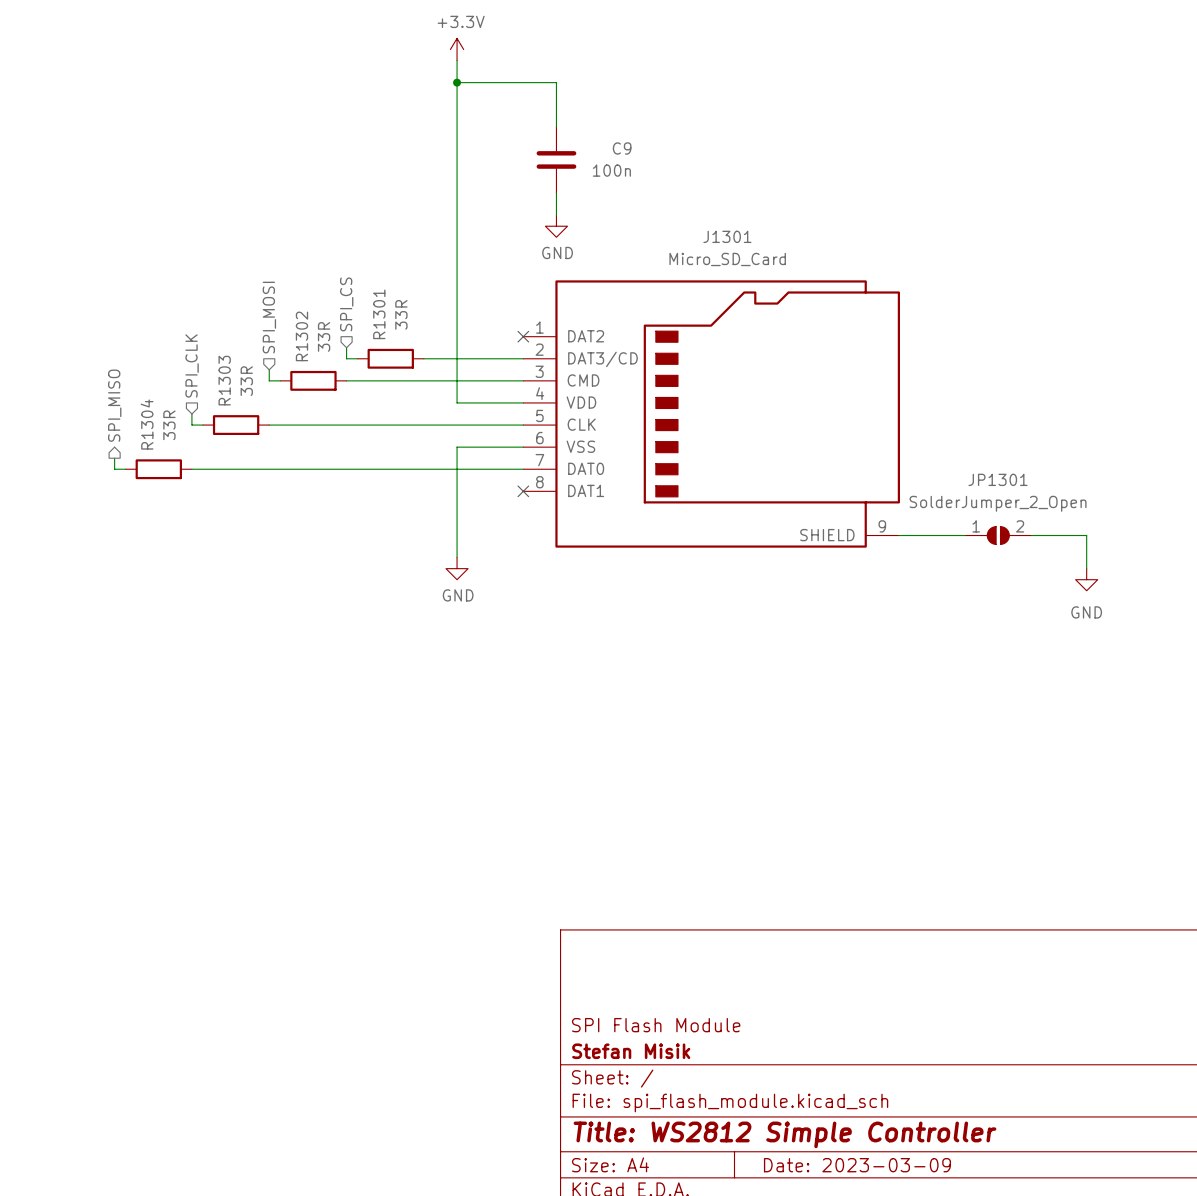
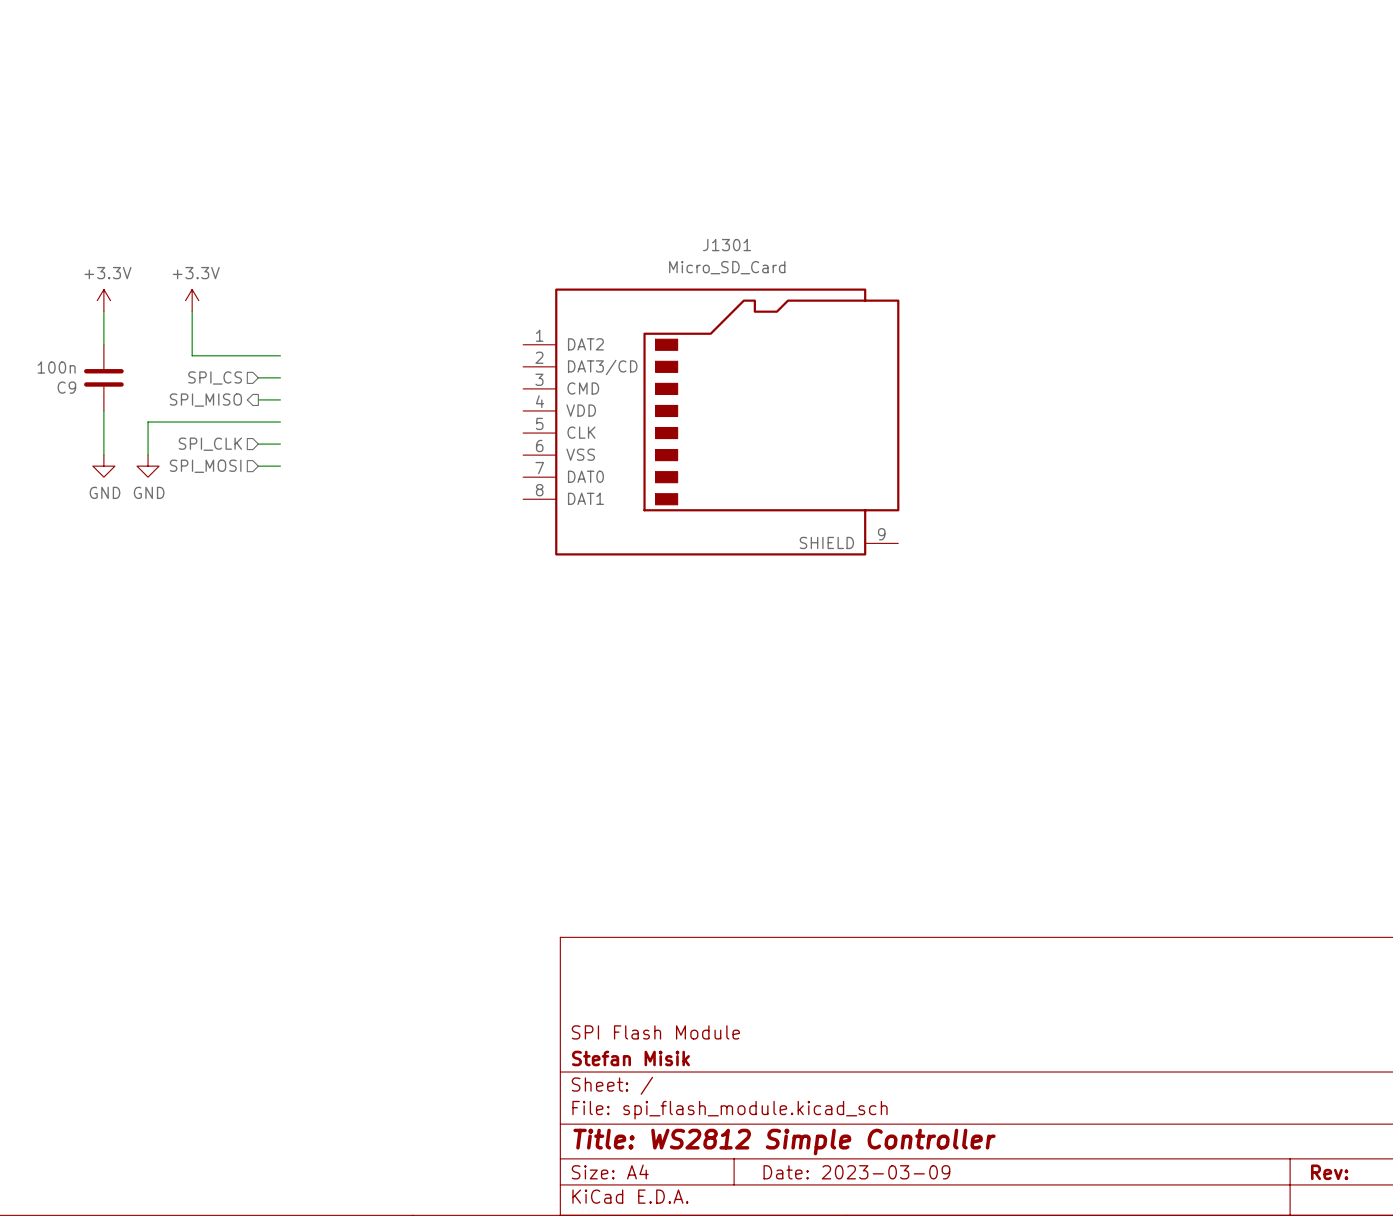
power symbol: +3.3V (457, 49) -> none
wire: (457, 60) (457, 402) (523, 402) -> none
wire: (457, 82) (556, 82) (556, 126) -> none
junction: (457, 82) -> none
C9 name position: C9 (622, 148) -> C9 (66, 387)
C9 position: (556, 159) -> (103, 377)
C9 value position: 100n (611, 170) -> 100n (56, 367)
wire: (556, 193) (556, 215) -> none
power symbol: GND (556, 226) -> none
power symbol: none -> +3.3V (103, 300)
power symbol: none -> +3.3V (192, 300)
wire: none -> (103, 311) (103, 344)
wire: none -> (192, 311) (192, 355) (280, 355)
hierarchical label rotation: 0° (346, 304) -> 90° counterclockwise (215, 377)
hierarchical label position: SPI_CS (346, 304) -> SPI_CS (215, 377)
hierarchical label rotation: 0° (269, 317) -> 90° counterclockwise (205, 466)
hierarchical label position: SPI_MOSI (269, 317) -> SPI_MOSI (205, 466)
no-connect mark: (523, 336) -> none
wire: (346, 347) (346, 358) (357, 358) -> none
R1301: 33R (390, 358) -> none
wire: (423, 358) (523, 358) -> none
hierarchical label rotation: 0° (192, 365) -> 90° counterclockwise (210, 444)
wire: none -> (258, 377) (280, 377)
wire: (269, 369) (269, 380) (280, 380) -> none
R1302: 33R (313, 380) -> none
wire: (346, 380) (523, 380) -> none
wire: none -> (258, 399) (280, 399)
wire: none -> (103, 410) (103, 455)
hierarchical label rotation: 0° (114, 405) -> 90° counterclockwise (205, 400)
wire: (191, 414) (191, 425) (202, 425) -> none
wire: none -> (280, 422) (148, 422) (148, 455)
R1303: 33R (236, 425) -> none
wire: (269, 425) (523, 425) -> none
wire: none -> (258, 444) (280, 444)
wire: (523, 447) (457, 447) (457, 557) -> none
power symbol: none -> GND (103, 466)
wire: (114, 458) (114, 469) (125, 469) -> none
power symbol: none -> GND (148, 466)
wire: none -> (258, 466) (280, 466)
R1304: 33R (158, 469) -> none
wire: (191, 469) (523, 469) -> none
no-connect mark: (523, 491) -> none
wire: (898, 535) (965, 535) -> none
JP1301: SolderJumper_2_Open (998, 535) -> none
wire: (1031, 535) (1086, 535) (1086, 568) -> none
power symbol: GND (457, 568) -> none
power symbol: GND (1086, 579) -> none

